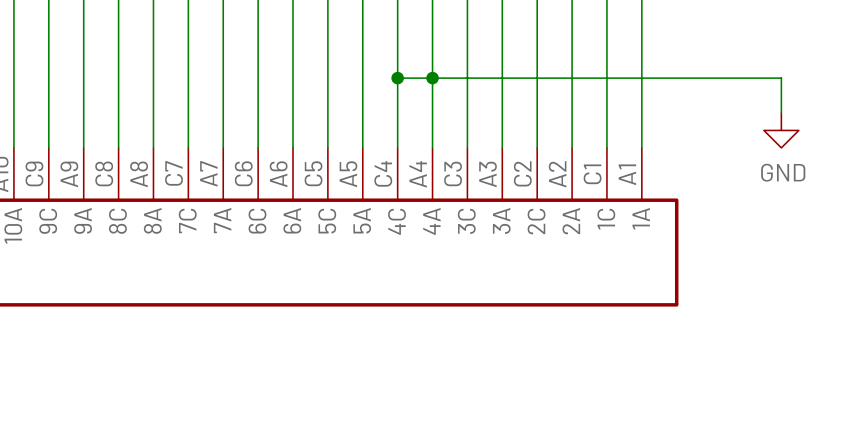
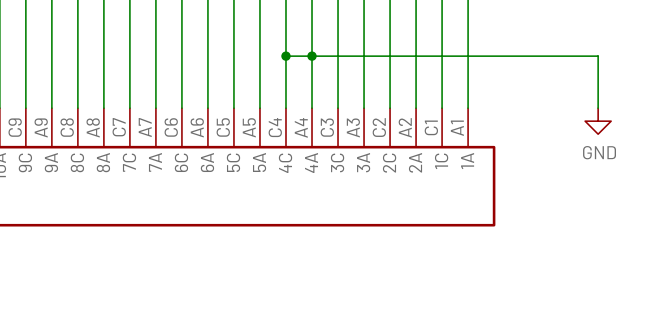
wire: (781, 78) (781, 112) -> (572, 56) (598, 56) (598, 108)
power symbol position: GND (781, 130) -> GND (598, 121)

